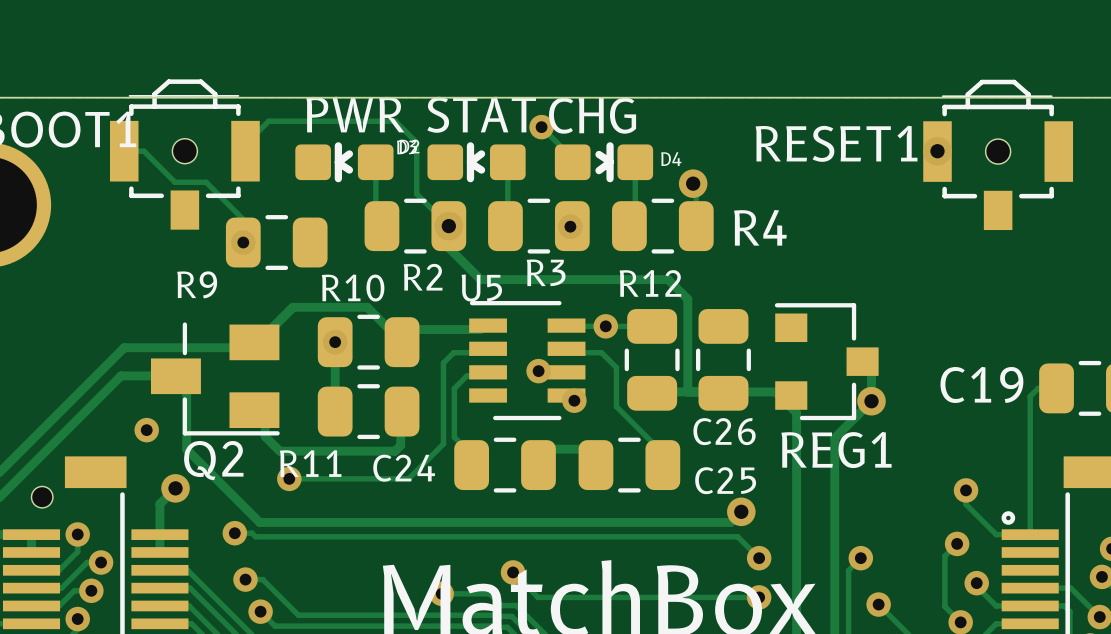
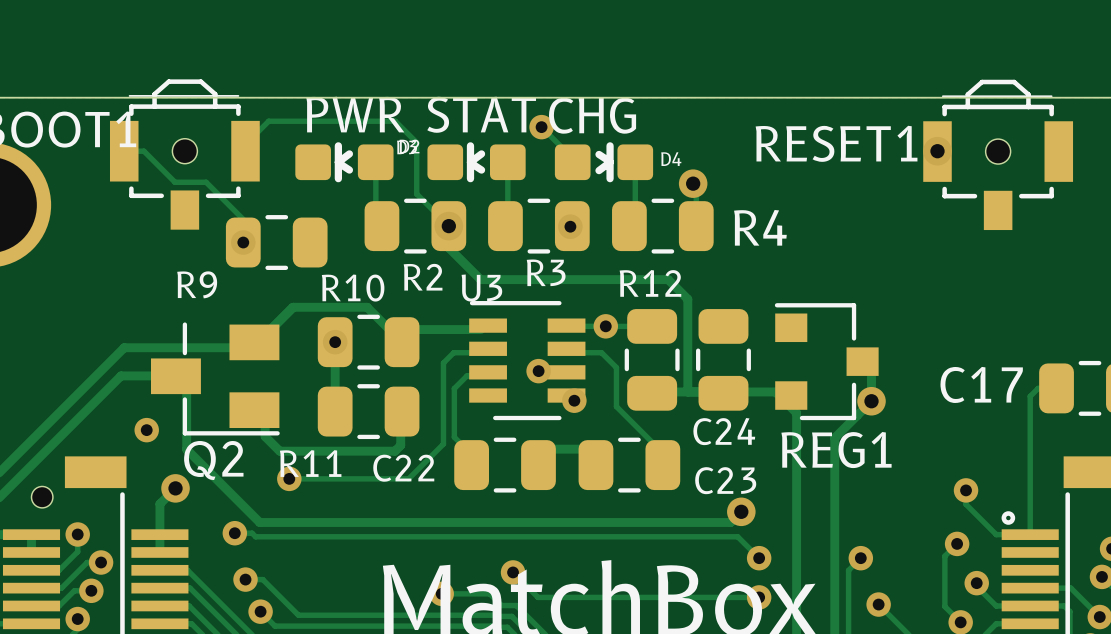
U5 name: U5 (481, 288) -> U3 (481, 288)
C19 name: C19 (981, 384) -> C17 (981, 384)
C26 name: C26 (724, 431) -> C24 (724, 431)
C24 name: C24 (404, 468) -> C22 (403, 468)
C25 name: C25 (725, 480) -> C23 (725, 480)

